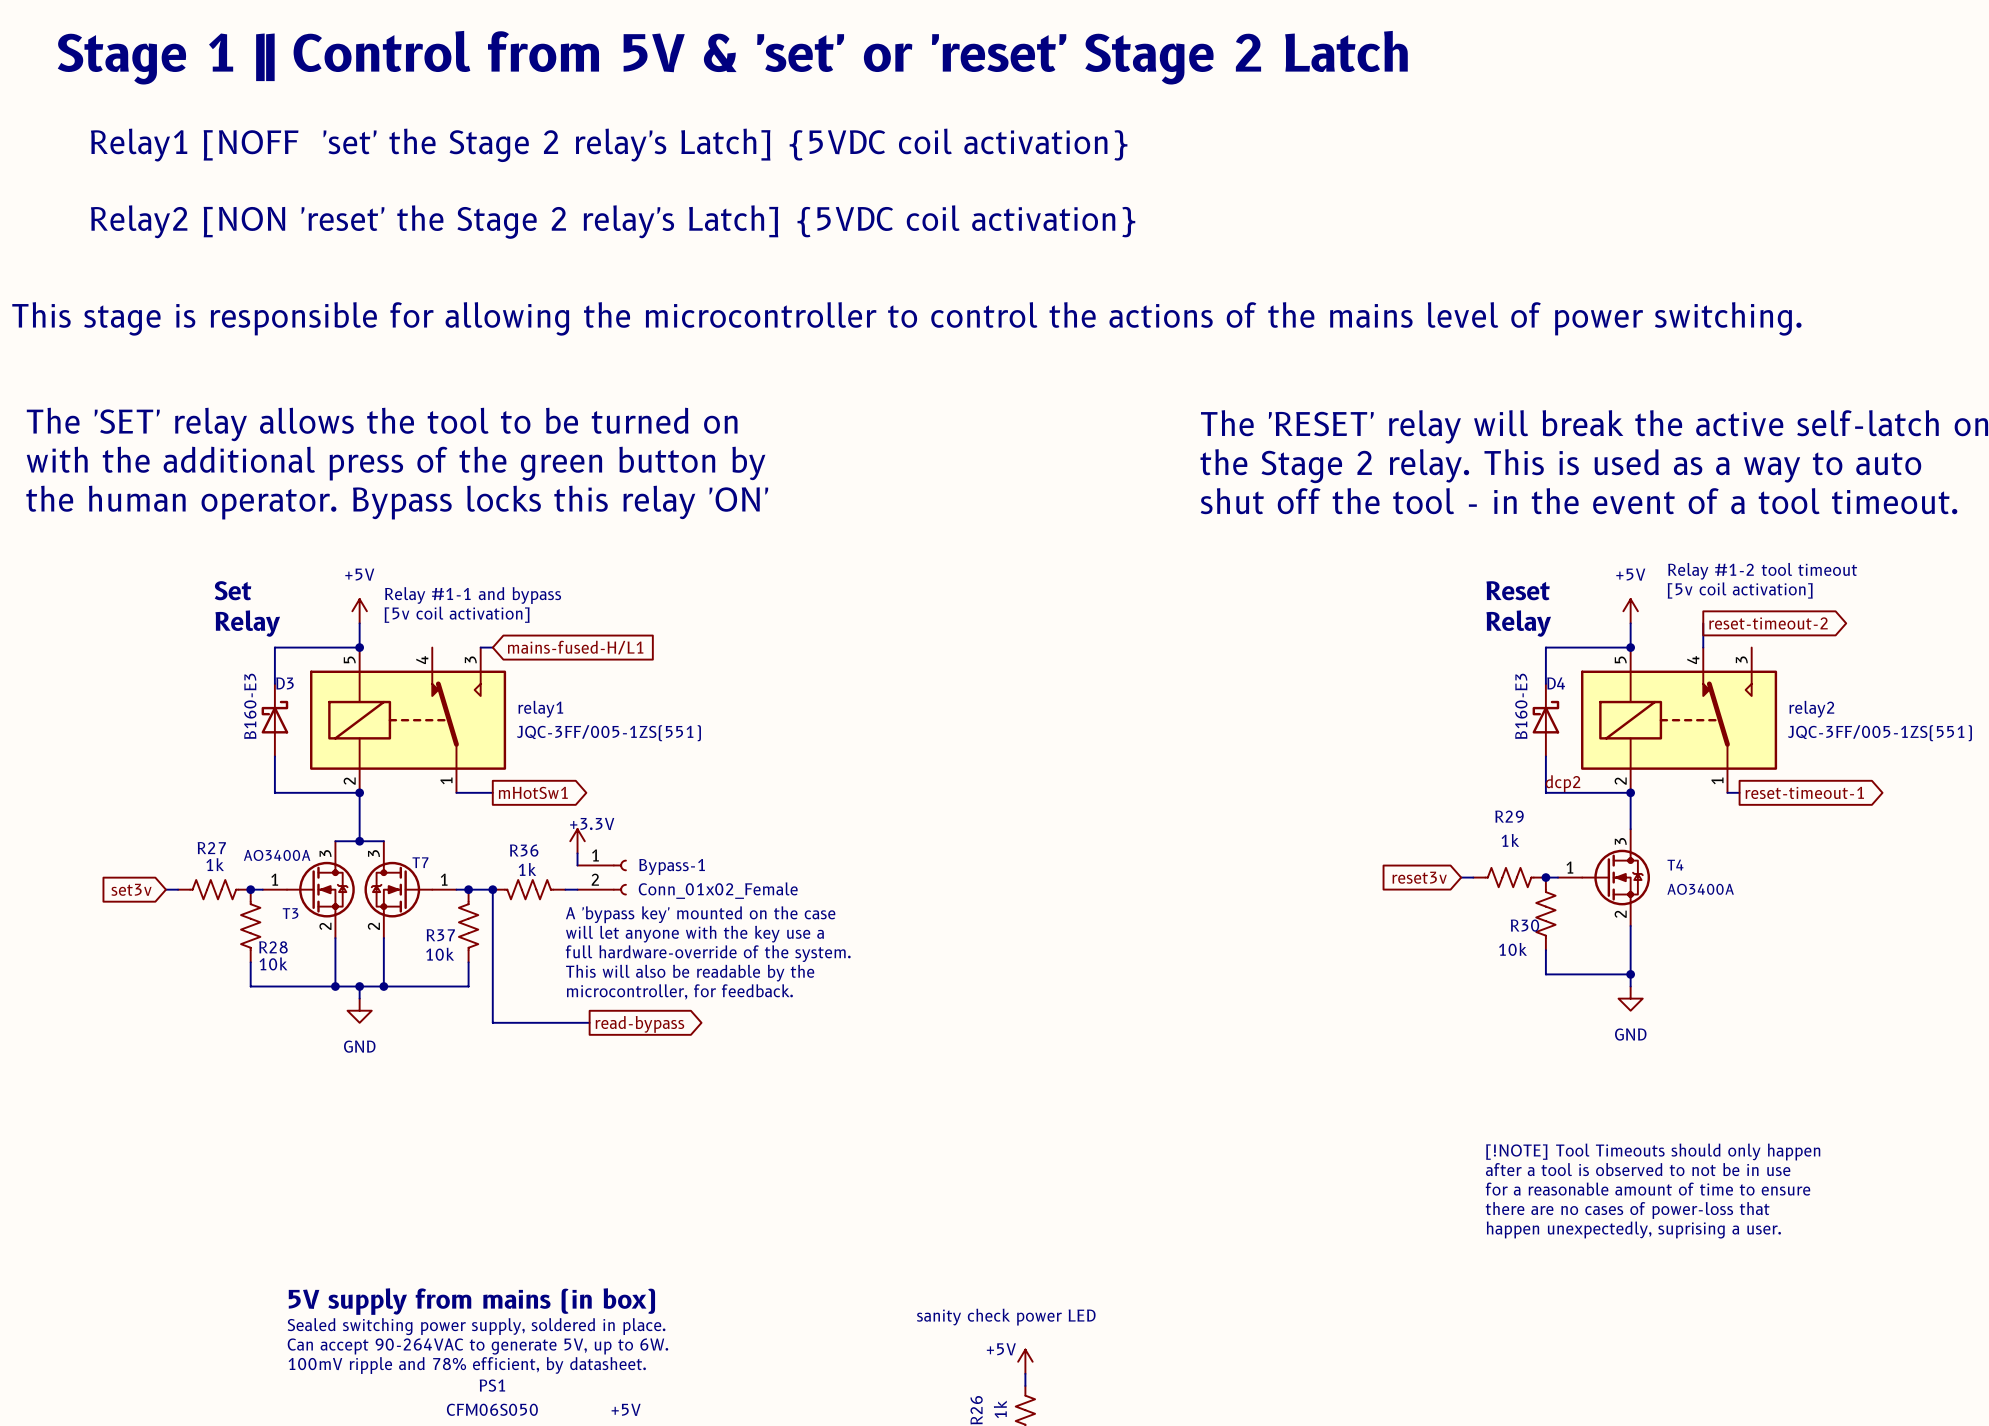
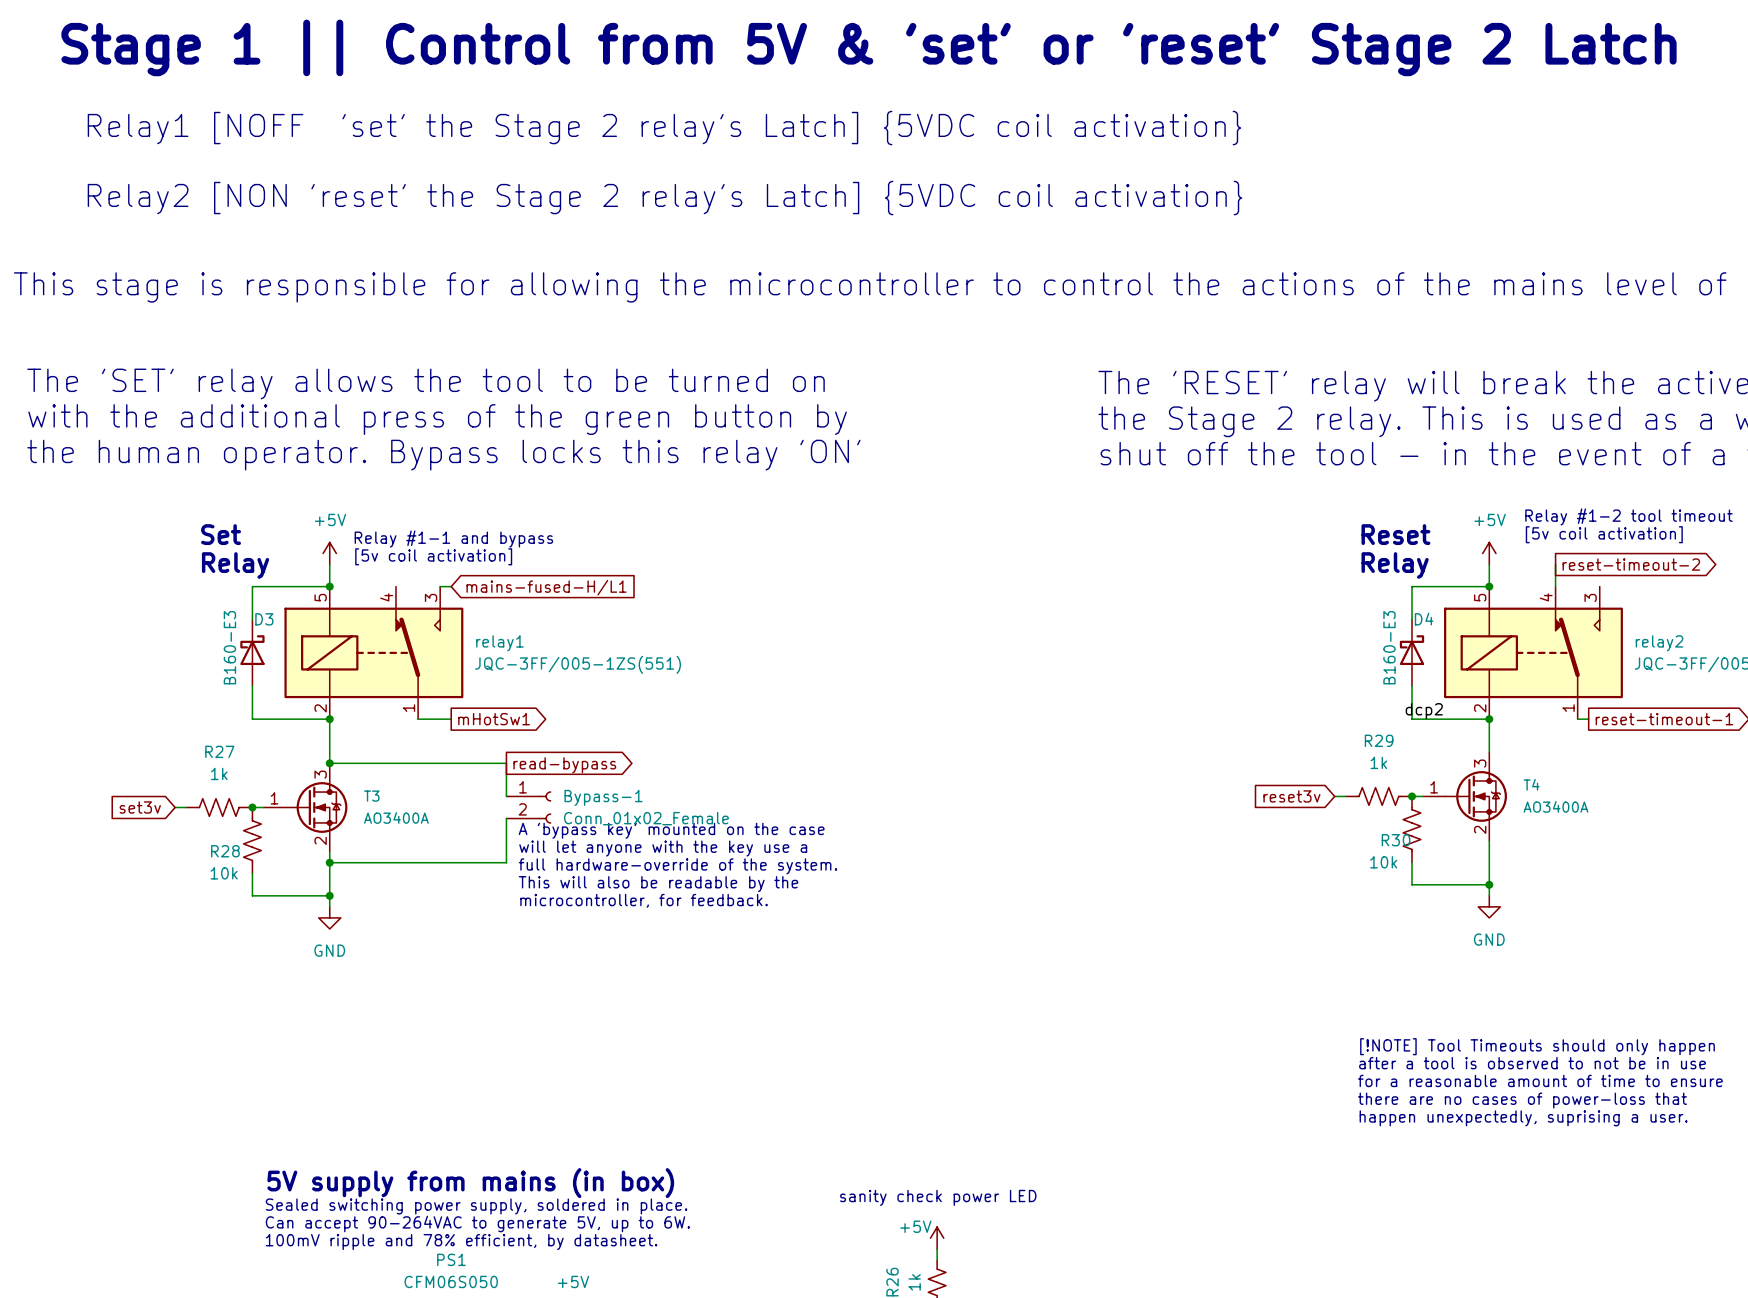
wire: (335, 841) (359, 841) -> none
wire: none -> (351, 763) (506, 763) (506, 796)
power symbol: +3.3V (577, 841) -> none
R27 name position: R27 (211, 848) -> R27 (219, 751)
wire: (577, 853) (577, 865) -> none
T3 value position: AO3400A (277, 855) -> AO3400A (396, 817)
R27 value position: 1k (215, 864) -> 1k (219, 773)
Bypass-1 position: (602, 877) -> (528, 807)
global label position: set3v (131, 889) -> set3v (140, 807)
wire: (165, 889) (178, 889) -> (175, 807) (186, 807)
R27 position: (214, 889) -> (219, 807)
junction position: (250, 889) -> (252, 807)
T3 position: (308, 889) -> (305, 807)
T7: (410, 889) -> none
wire: (456, 889) (492, 889) (492, 1022) (589, 1022) -> none
junction: (468, 889) -> none
junction: (492, 889) -> none
R36: 1k (529, 889) -> none
wire: (565, 889) (577, 889) -> none
wire: none -> (506, 818) (506, 862) (329, 862)
T3 name position: T3 (290, 913) -> T3 (371, 796)
R28 position: (250, 925) -> (252, 840)
R37: 10k (468, 925) -> none
wire: (335, 938) (335, 986) -> none
wire: (383, 938) (383, 986) -> none
R28 name position: R28 (273, 947) -> R28 (225, 851)
junction: none -> (329, 862)
wire: (250, 962) (250, 986) (274, 986) -> (252, 873) (252, 895)
wire: (468, 962) (468, 986) (359, 986) -> (329, 851) (329, 895)
R28 value position: 10k (273, 963) -> 10k (224, 873)
junction: (335, 986) -> none
junction: (383, 986) -> none
global label position: read-bypass (639, 1024) -> read-bypass (564, 765)

